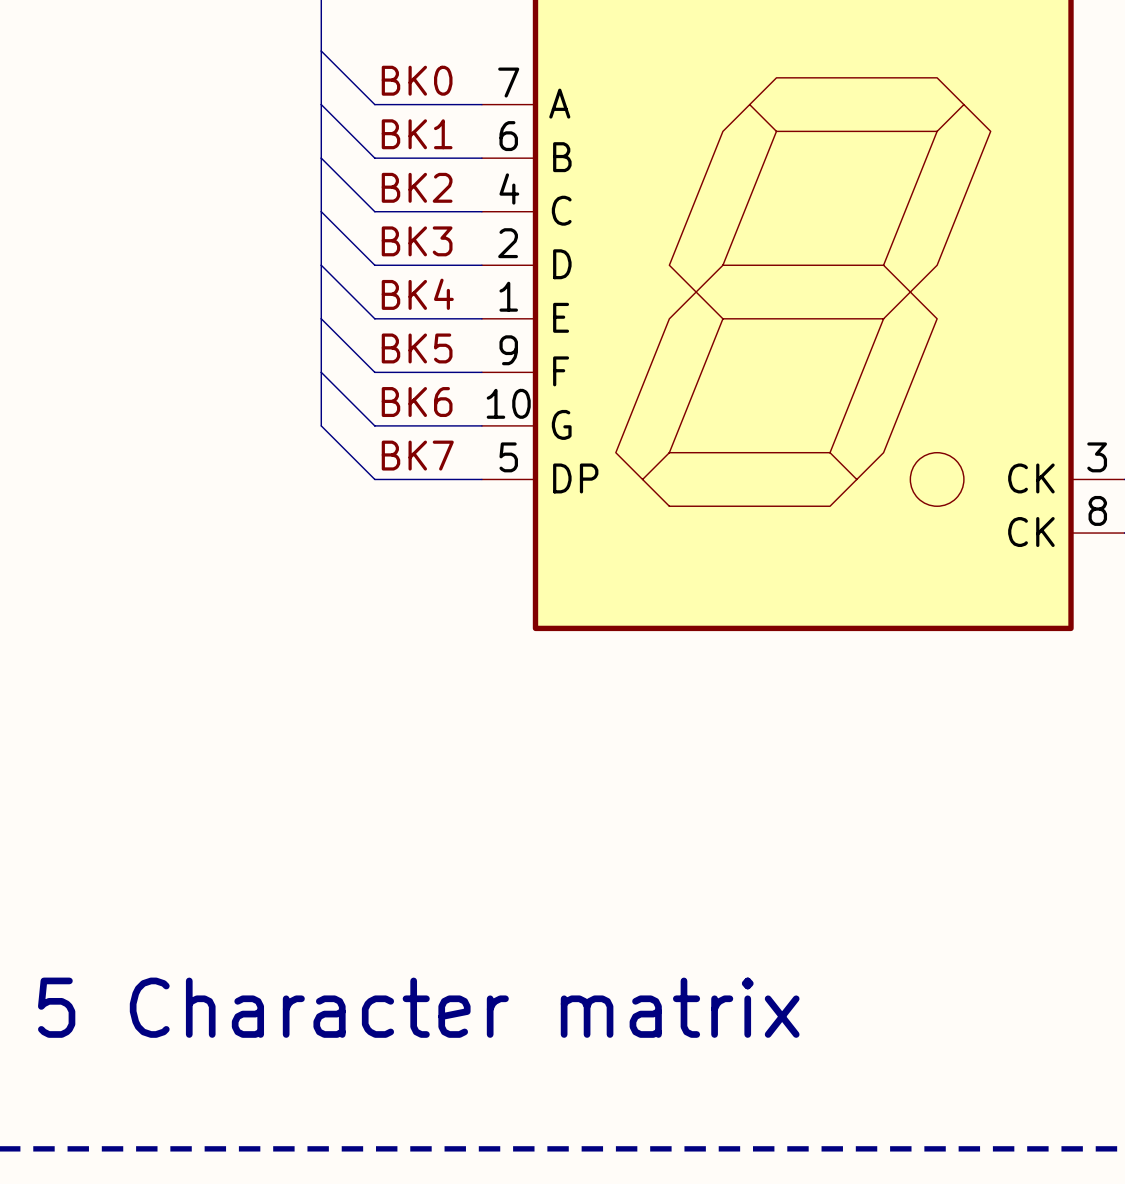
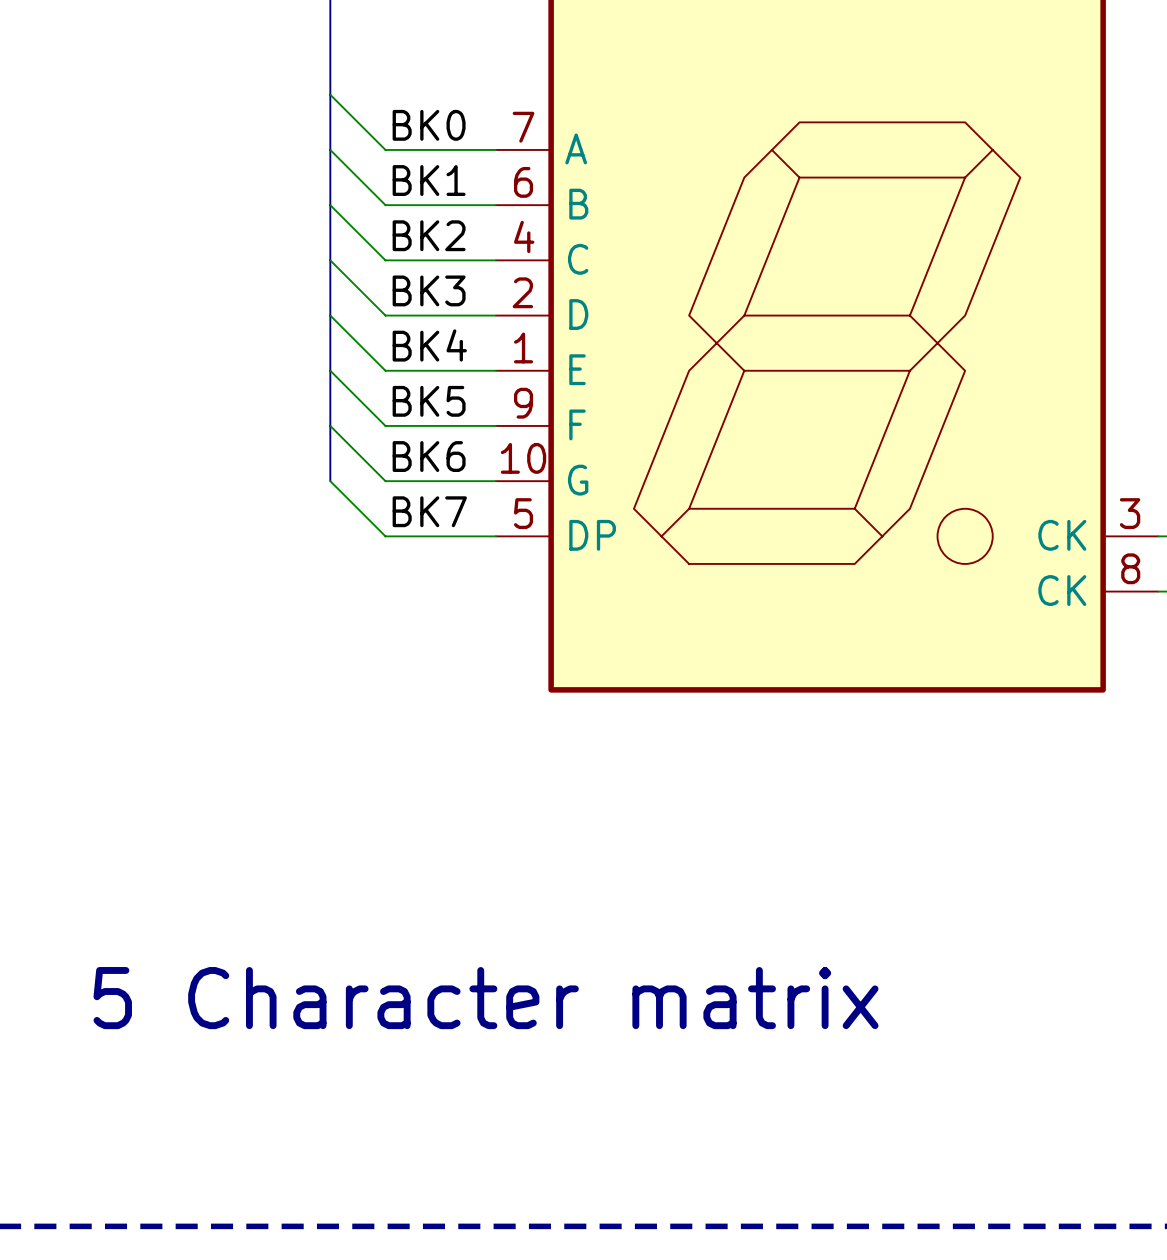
text position: 5 Character matrix (418, 1007) -> 5 Character matrix (486, 998)

